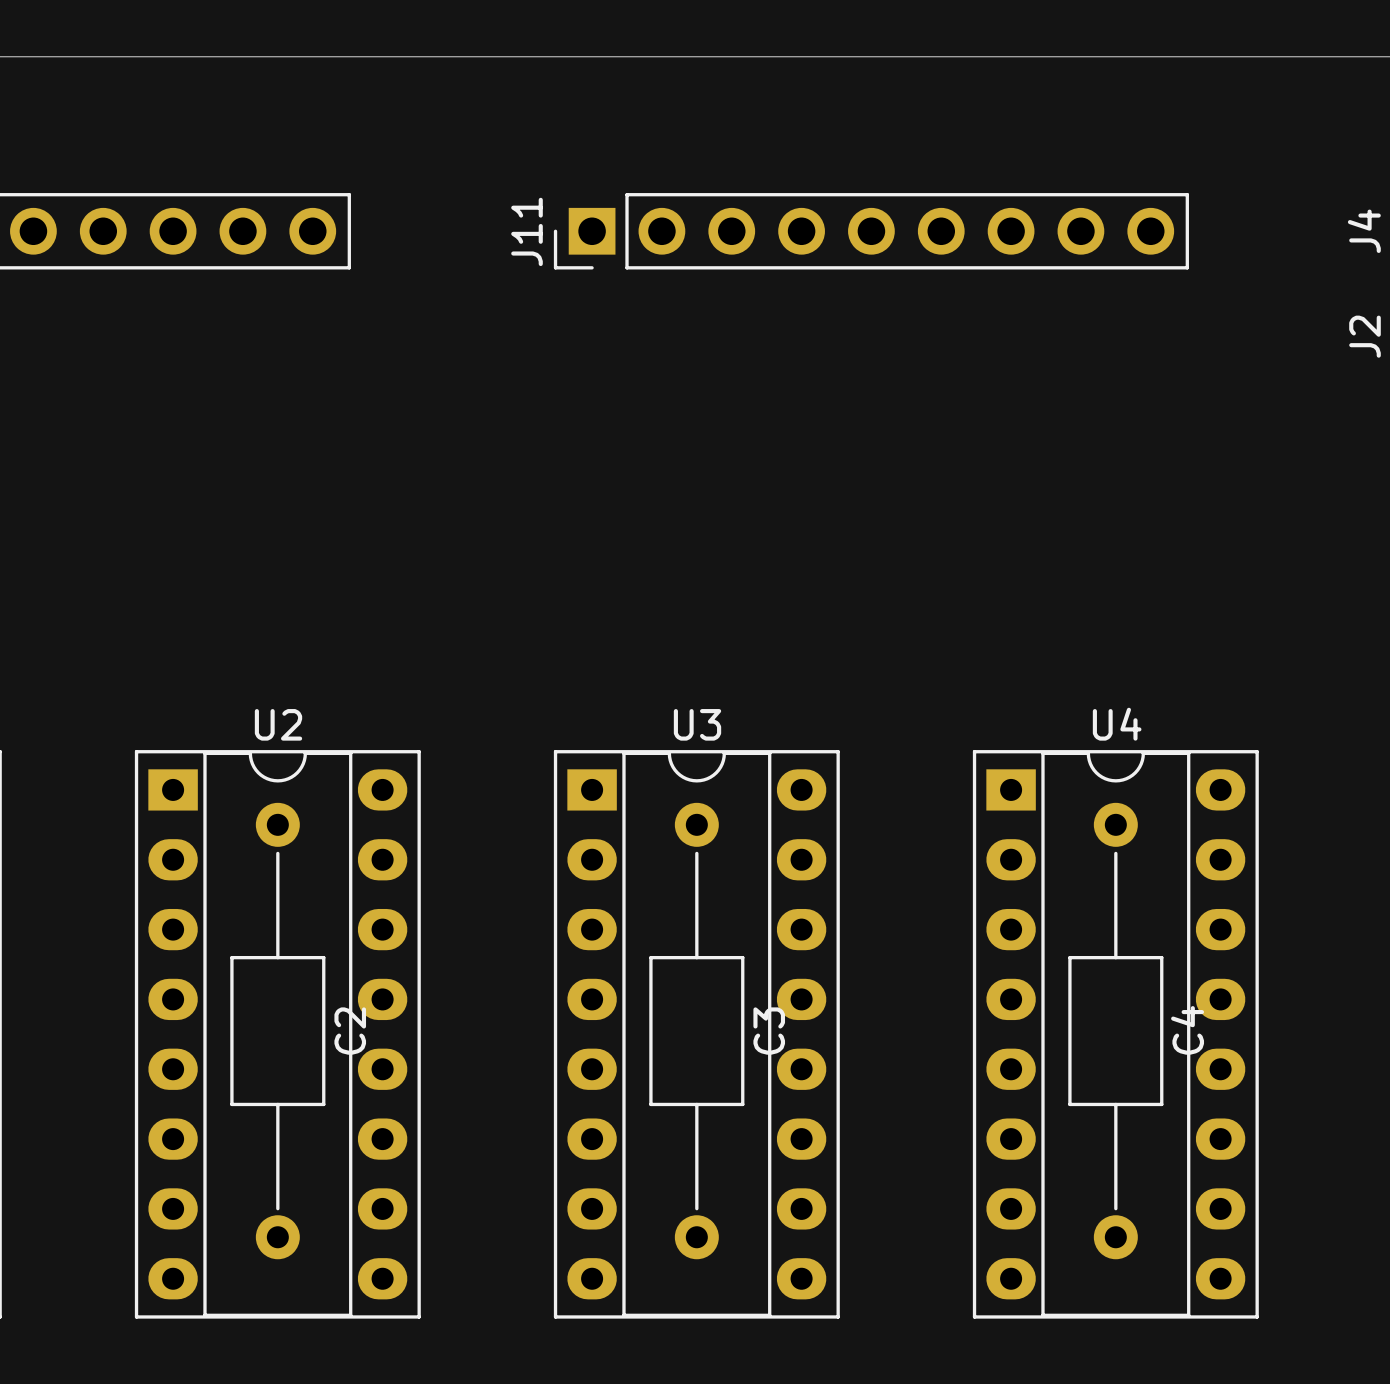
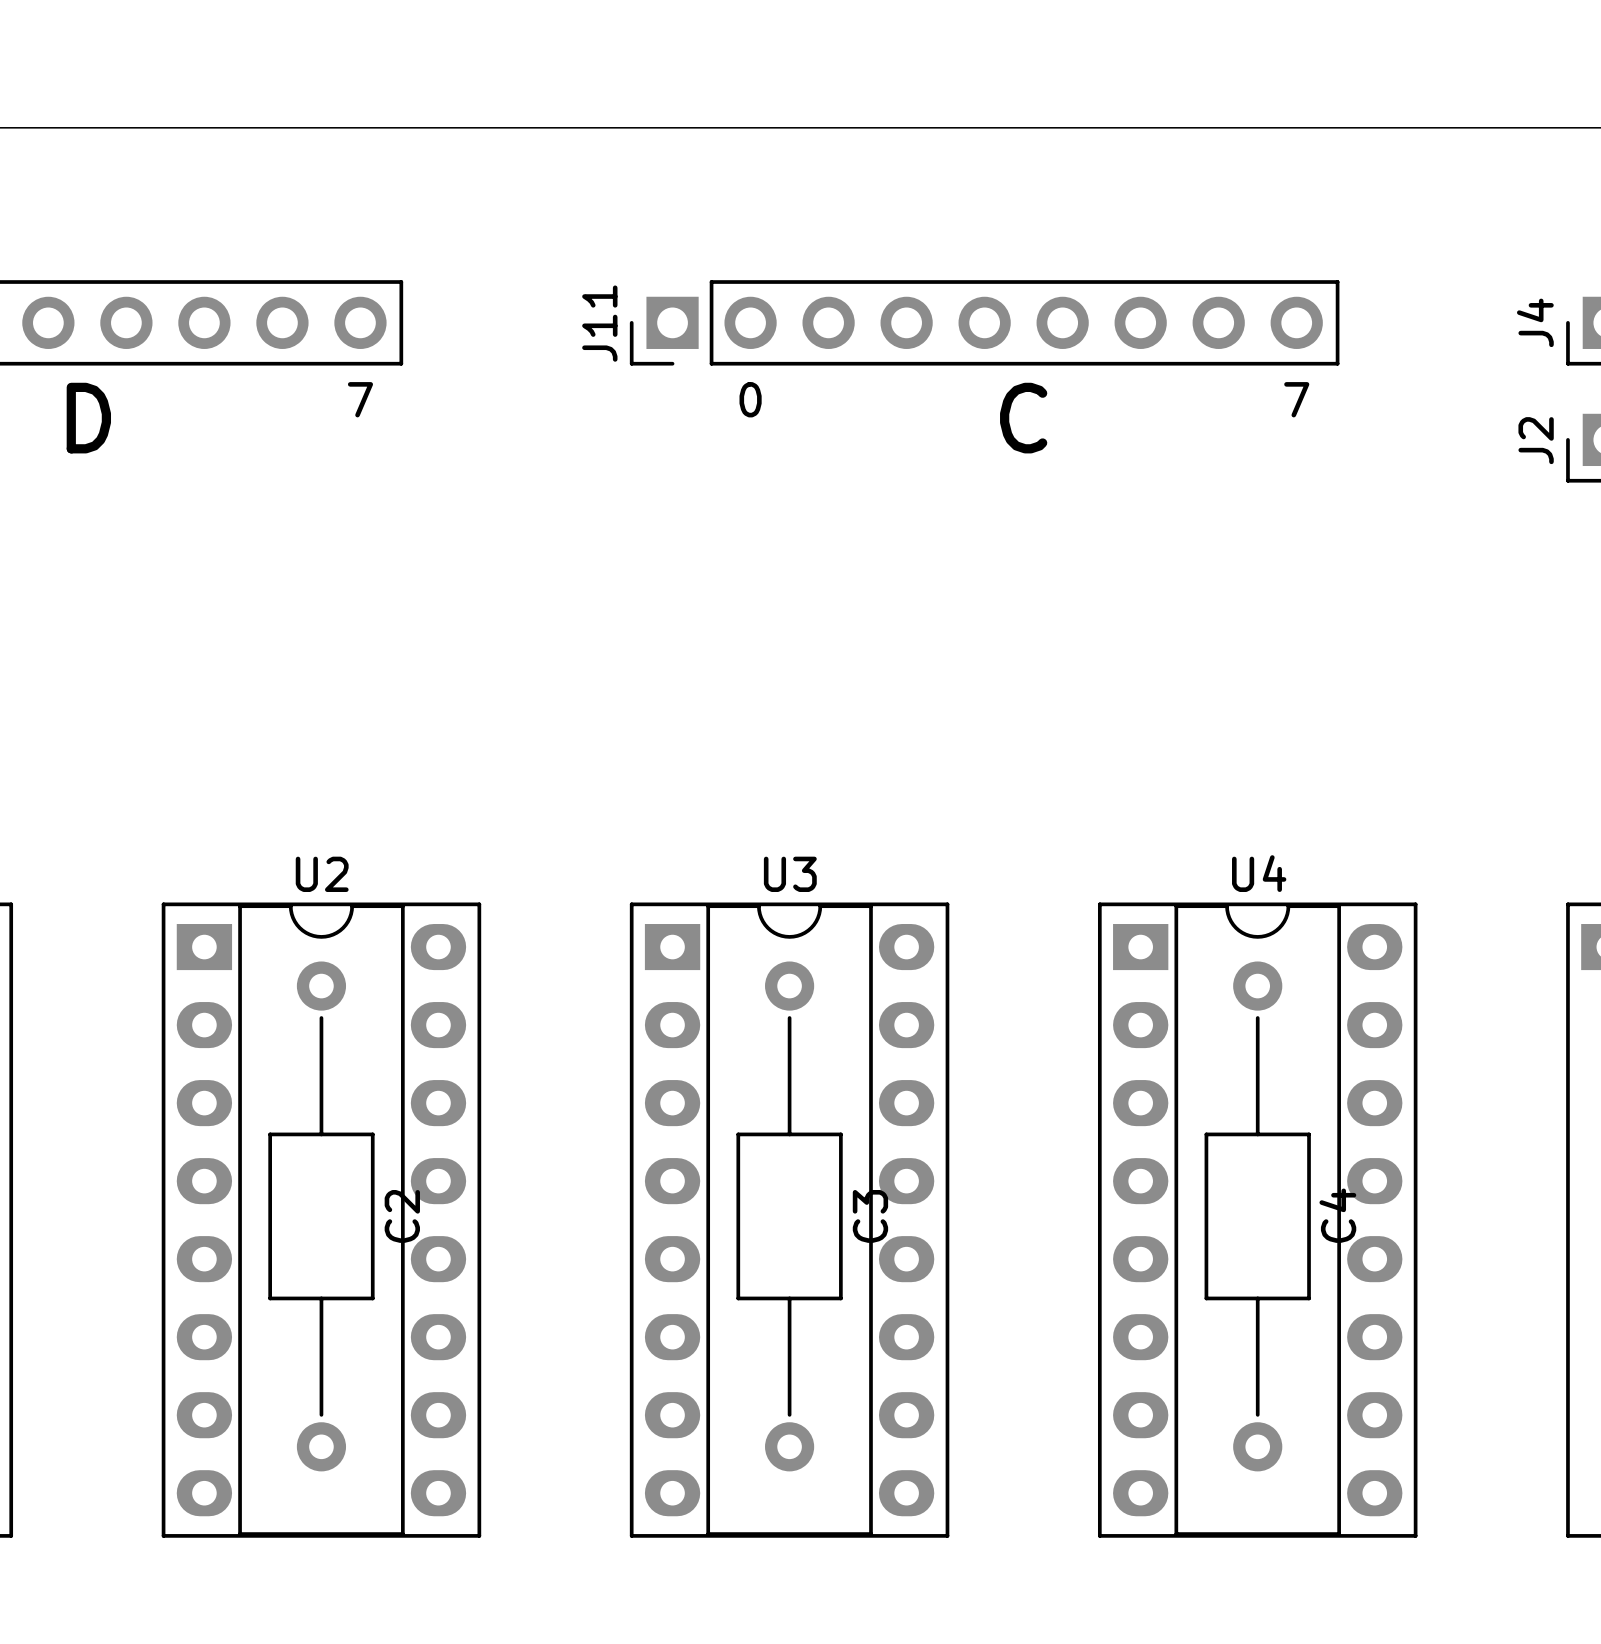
text: none -> 7 (360, 399)
text: none -> 0 (750, 399)
text: none -> 7 (1296, 399)
text: none -> D (88, 418)
text: none -> C (1023, 418)

